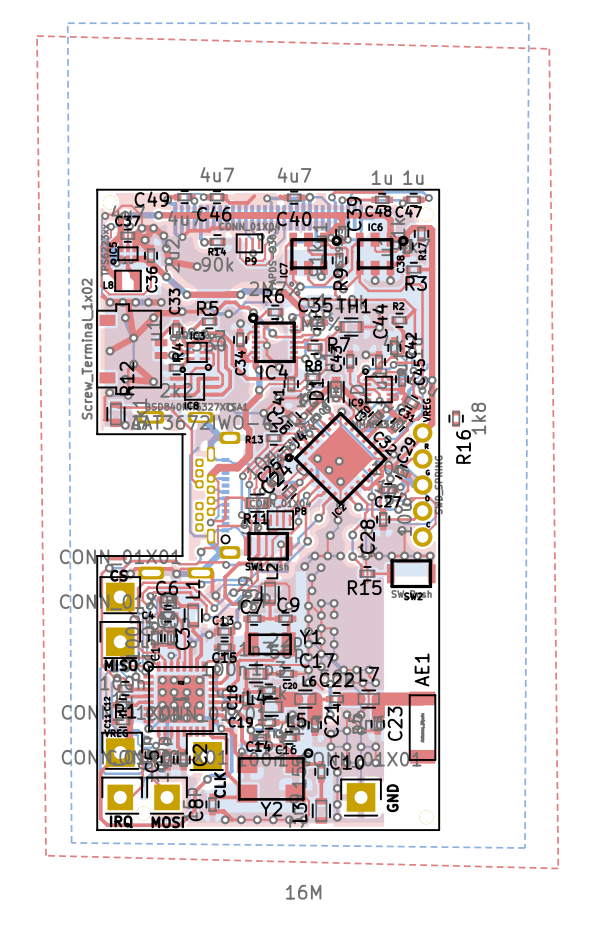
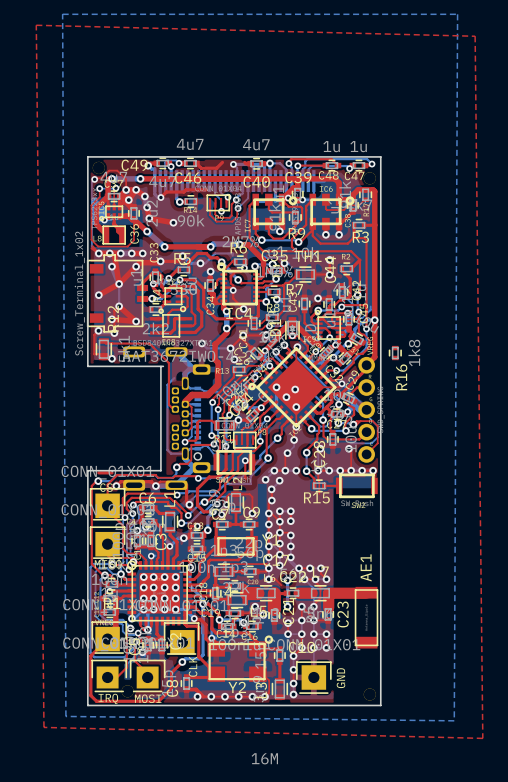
C39 name rotation: 0° (354, 213) -> 90° clockwise (298, 177)
R9 name rotation: 0° (340, 279) -> 90° clockwise (296, 233)

